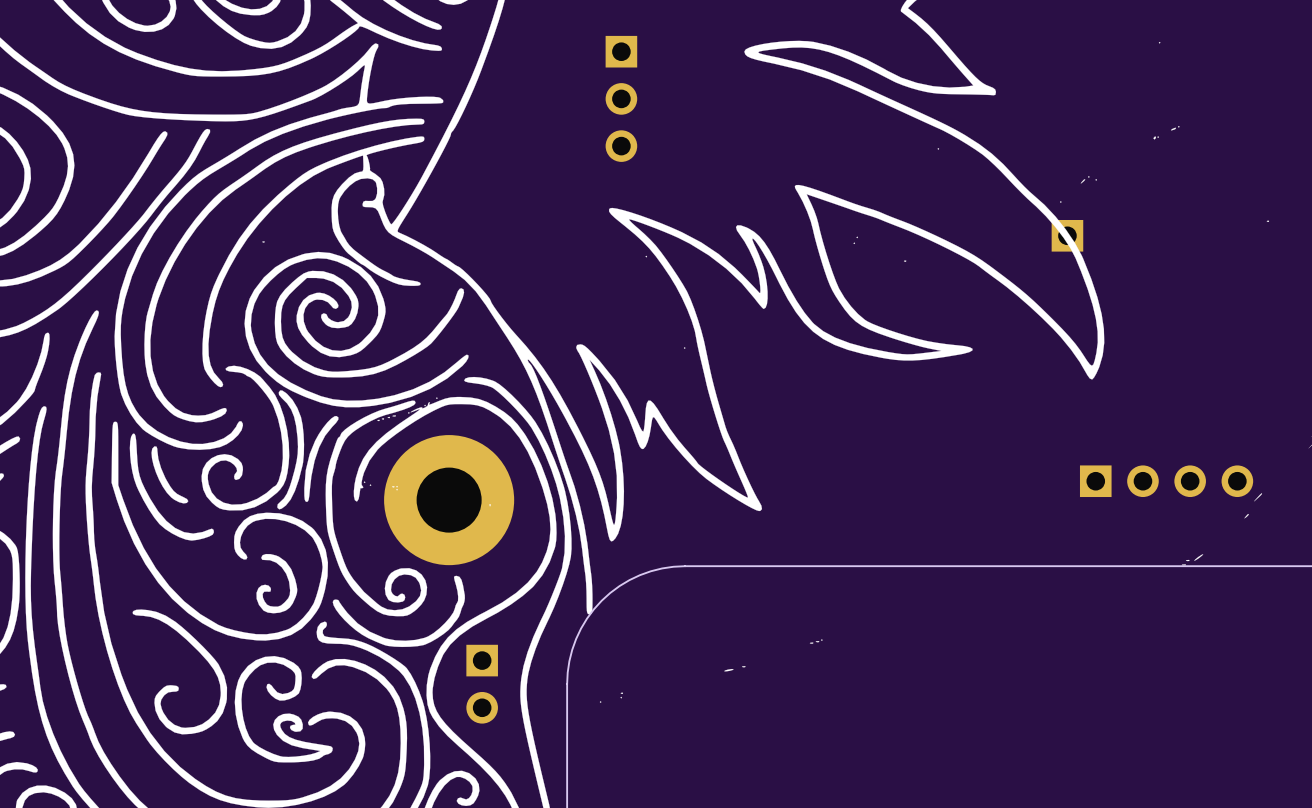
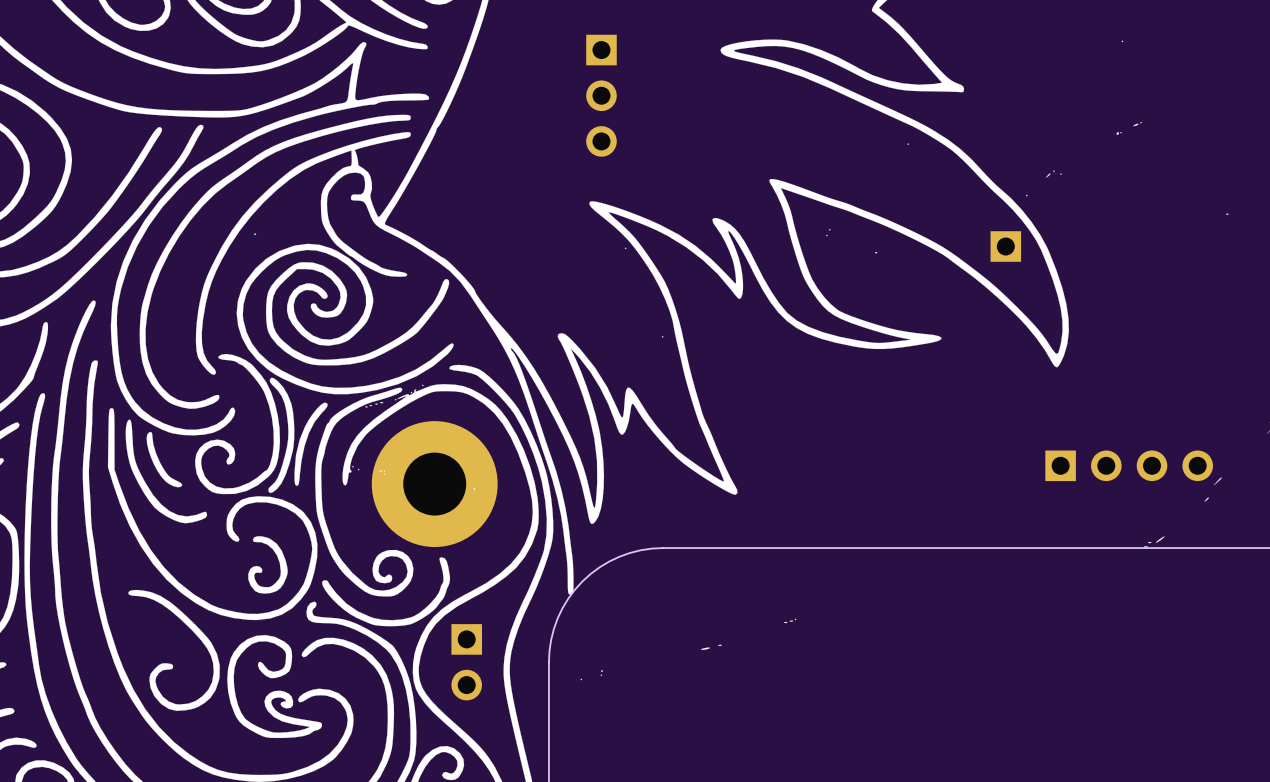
part position: (1067, 235) -> (1005, 246)

